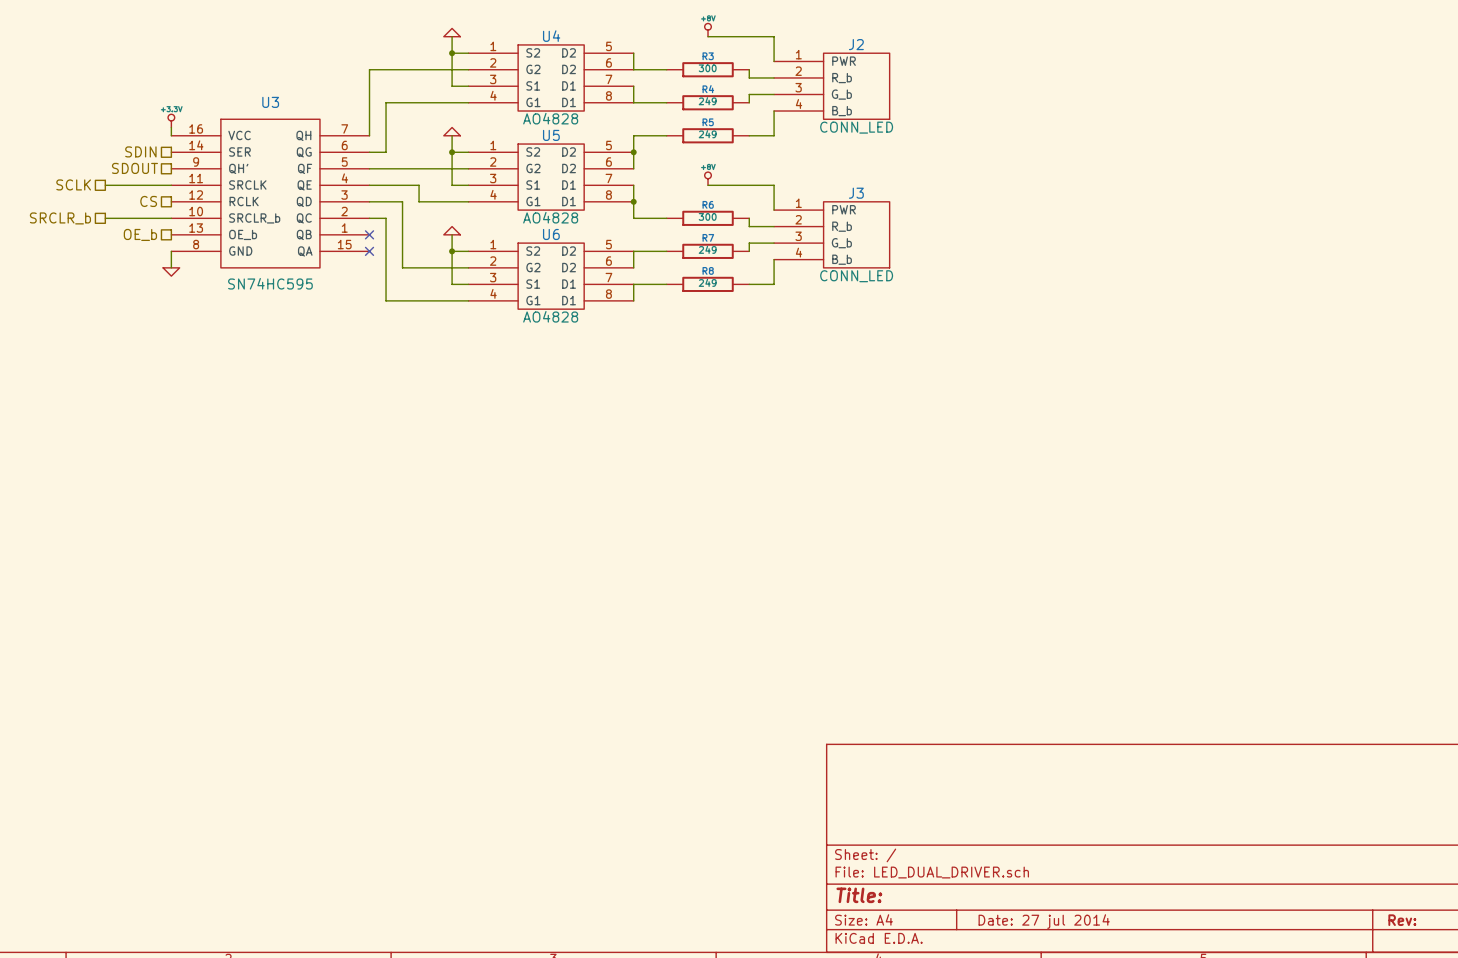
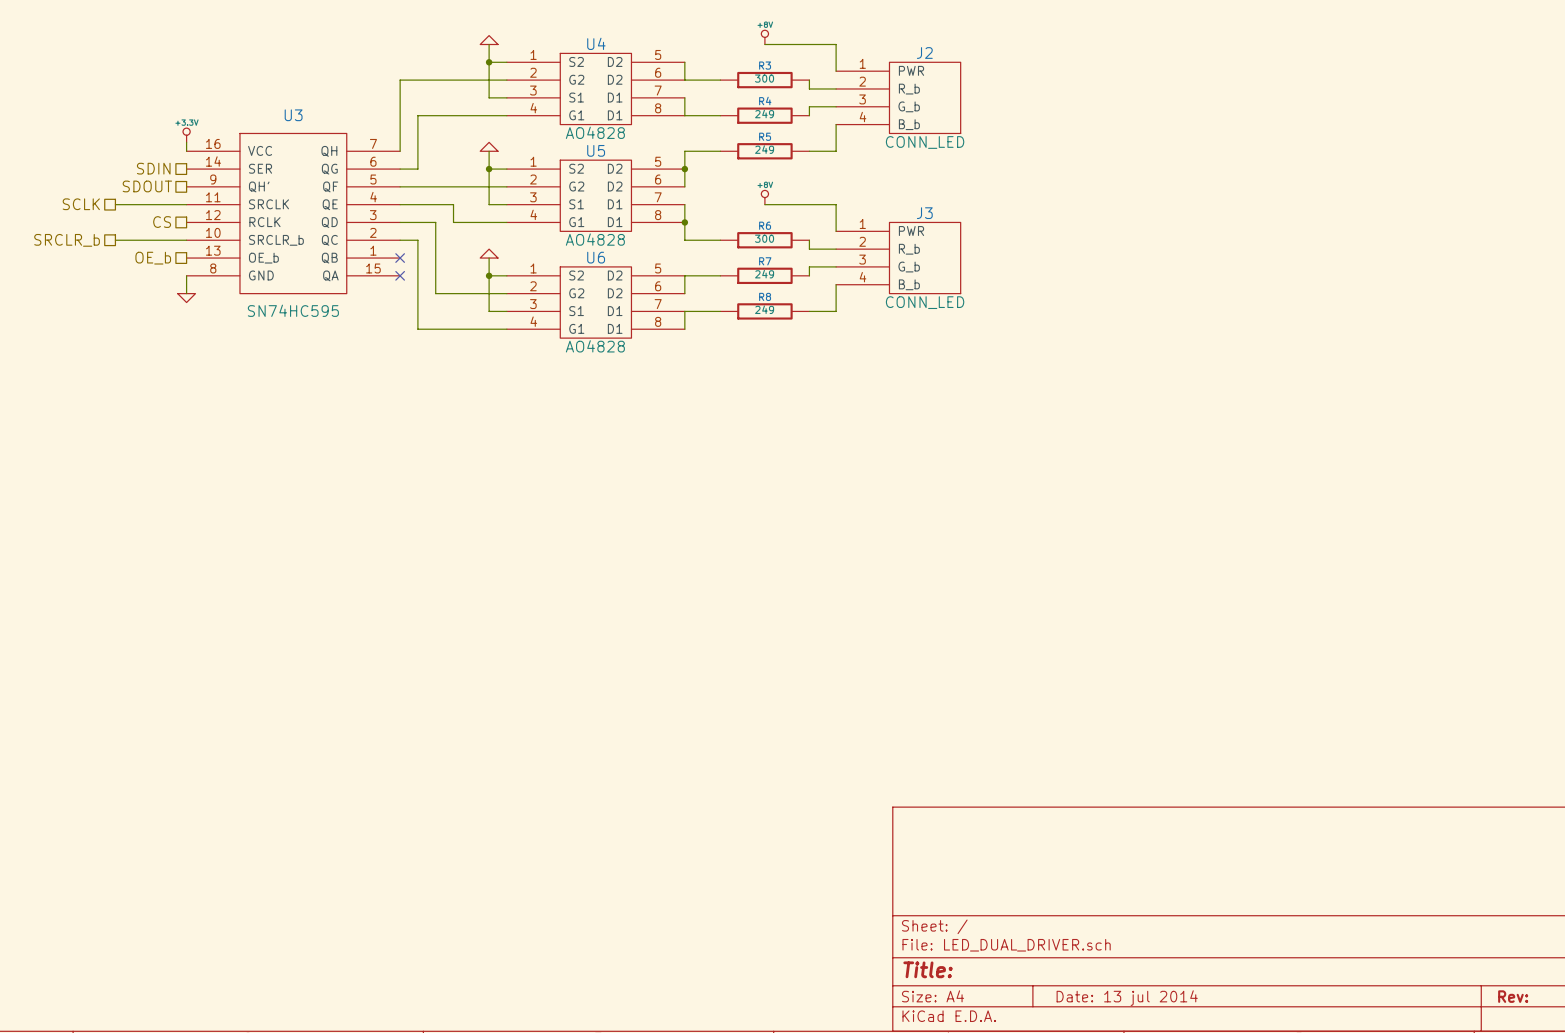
title block: Date: 27 jul 2014 (1044, 921) -> Date: 13 jul 2014 (1127, 998)

